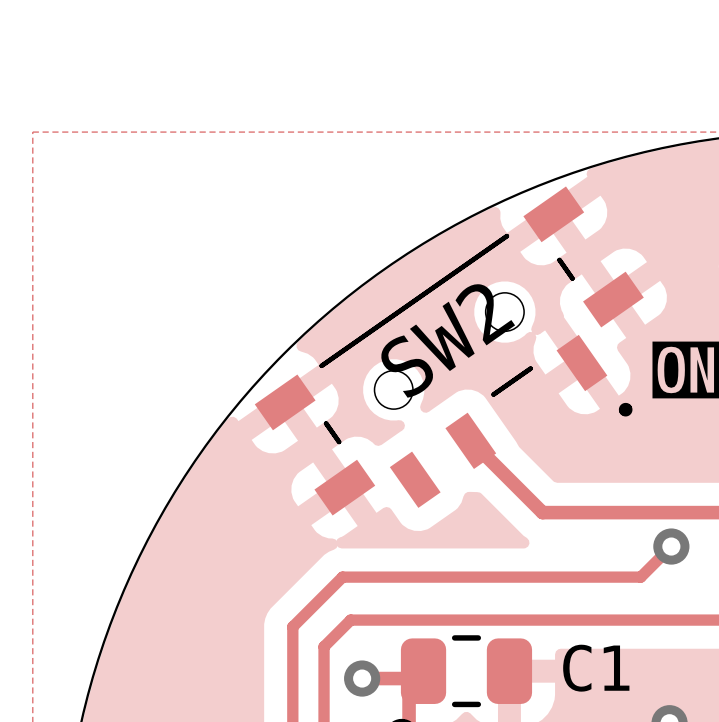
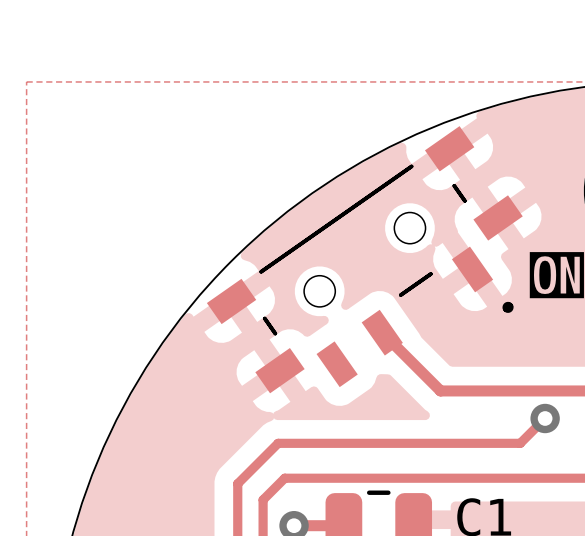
SW2: (449, 350) -> none
part: none -> (364, 259)

